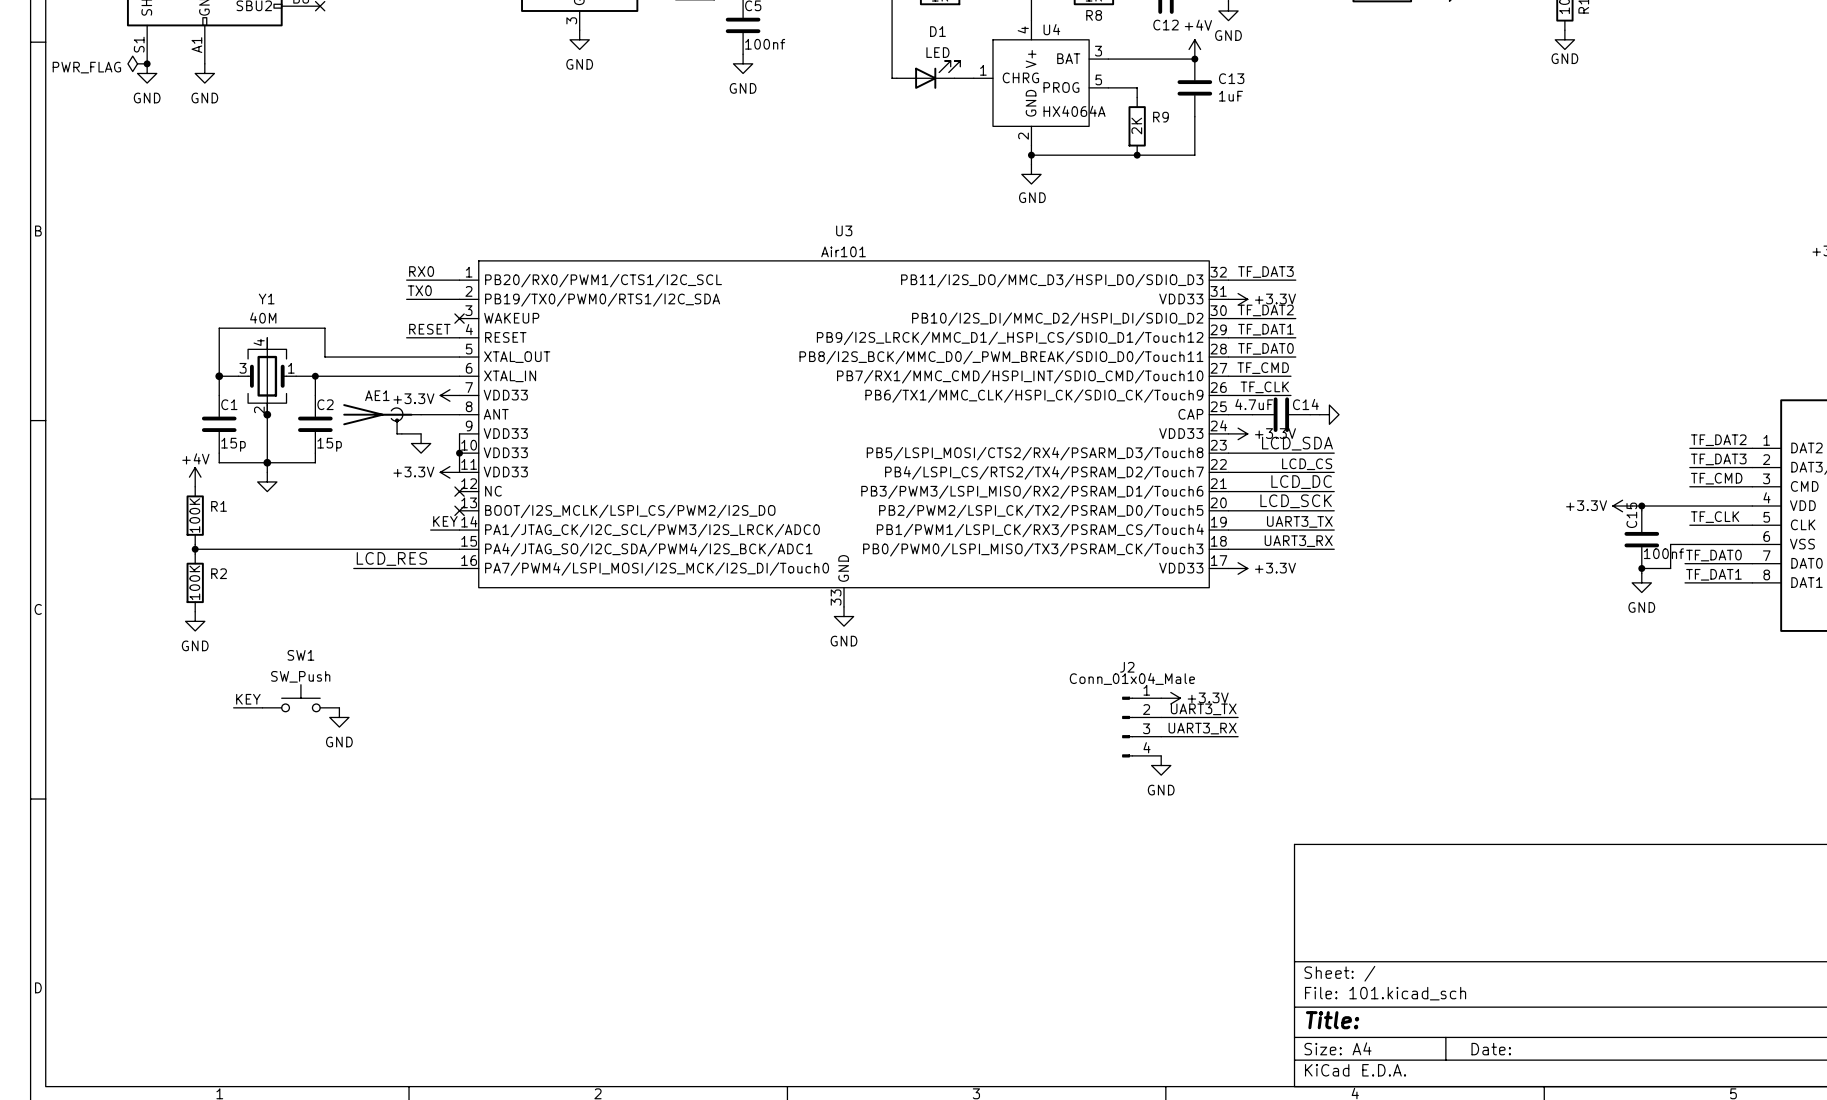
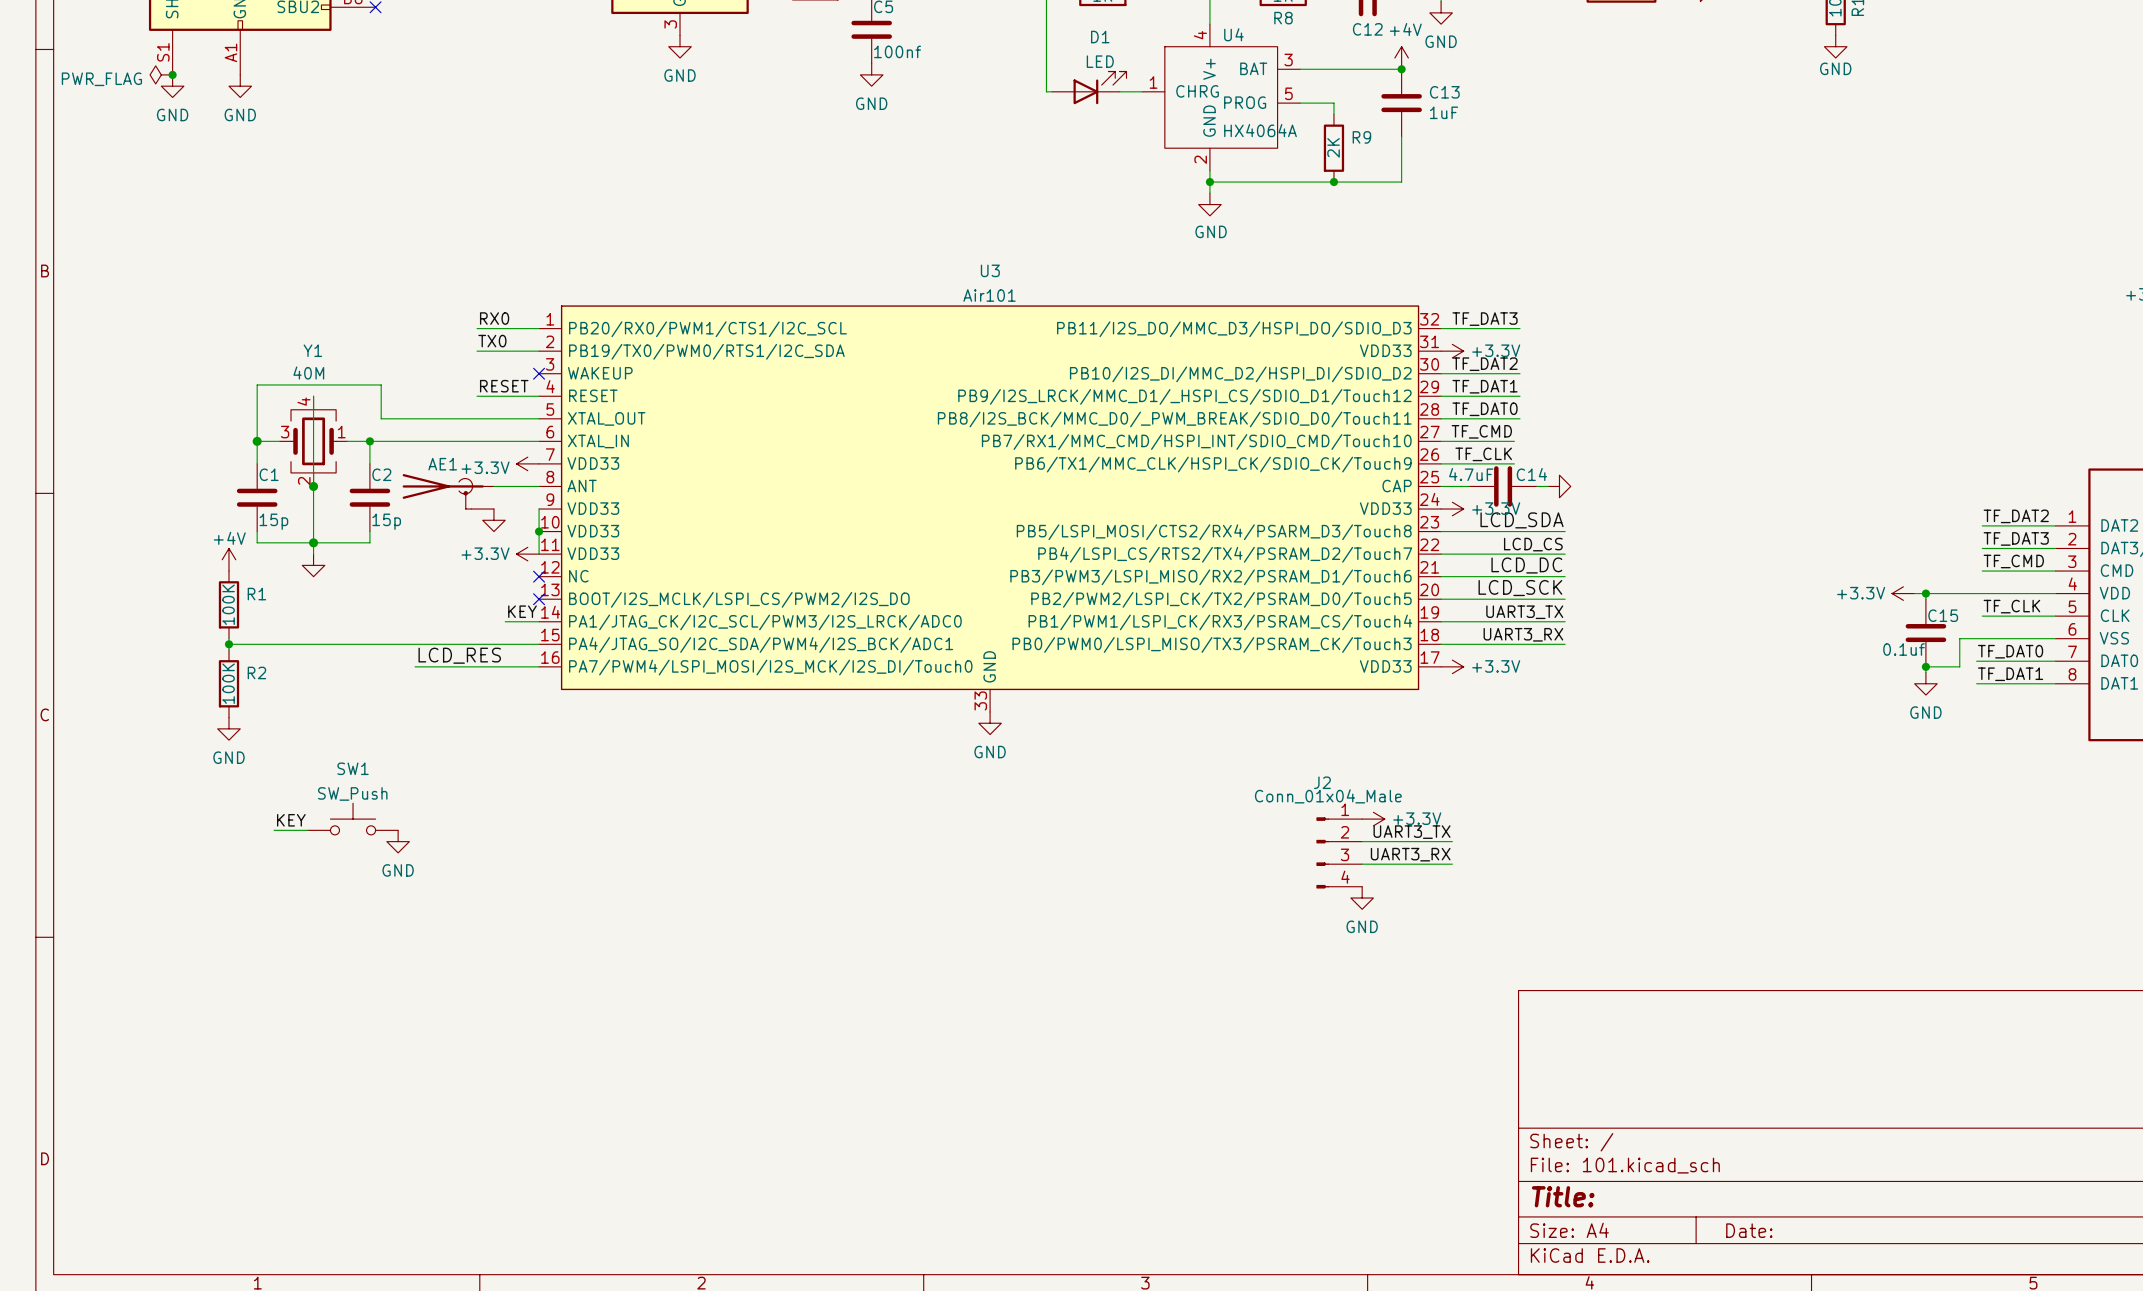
C15 name rotation: 0° (1631, 515) -> 90° clockwise (1943, 615)
C15 text: none -> 0.1uf (1904, 649)
C15 value: 100nf (1663, 553) -> none

